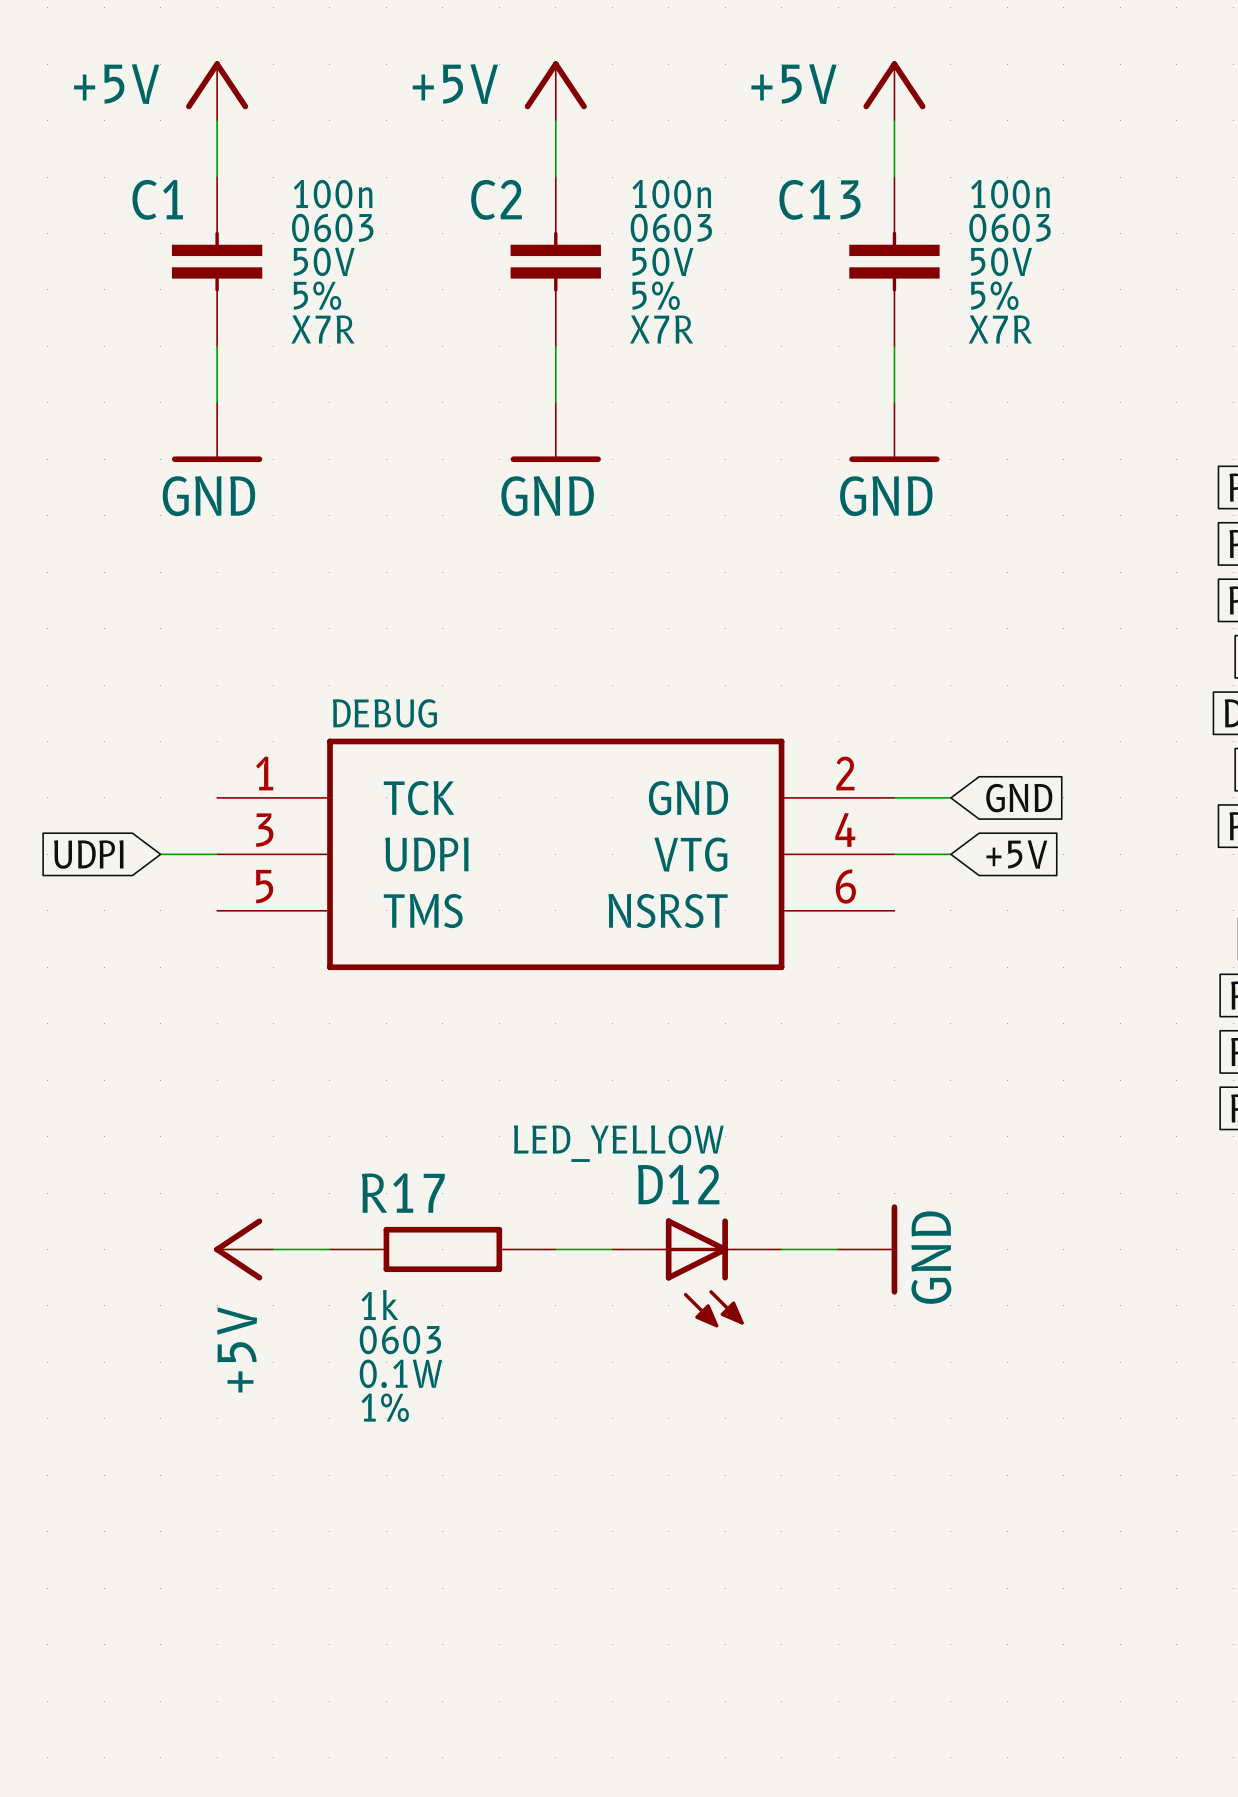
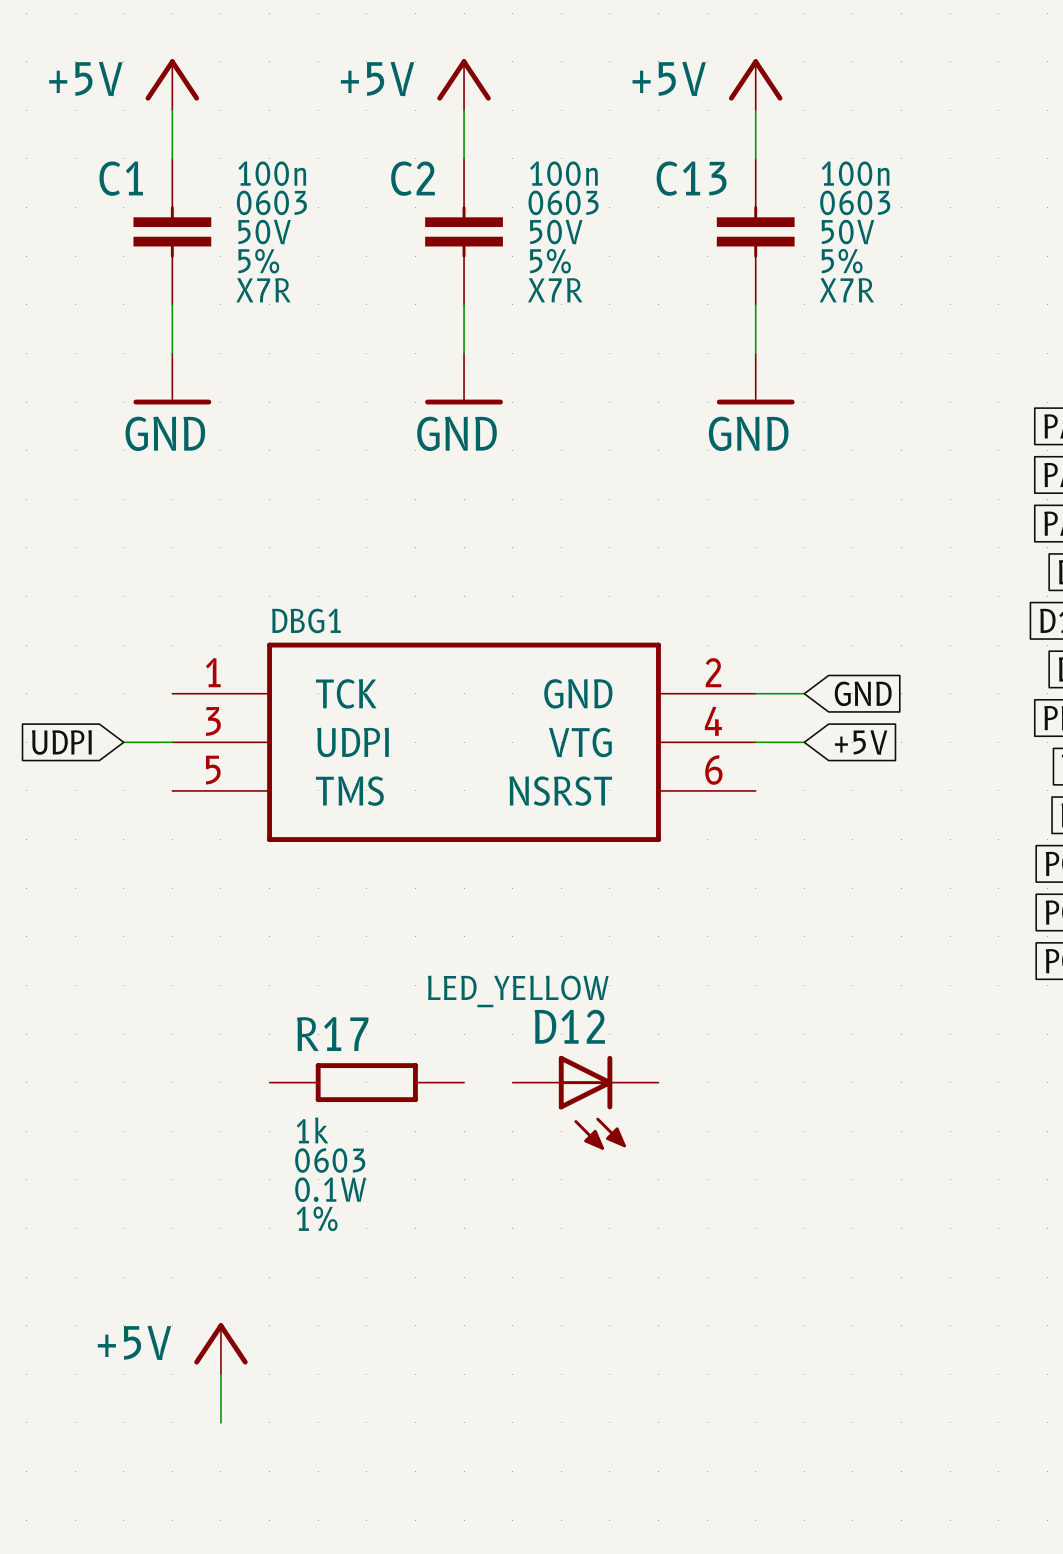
DEBUG name: DEBUG (384, 713) -> DBG1 (306, 620)
power symbol rotation: 0° (238, 1249) -> 90° clockwise (220, 1343)
power symbol position: +5V (243, 1249) -> +5V (220, 1348)
wire: (273, 1249) (329, 1249) -> none
wire: (555, 1249) (612, 1249) -> none
wire: (781, 1249) (838, 1249) -> none
power symbol: GND (867, 1249) -> none
wire: none -> (220, 1374) (220, 1422)

